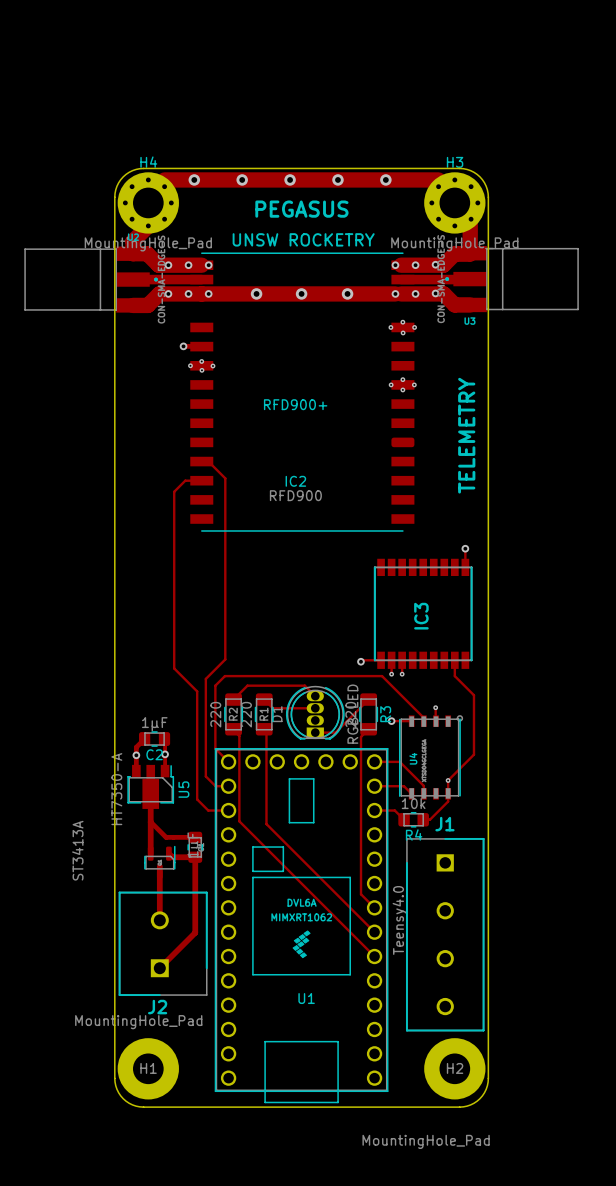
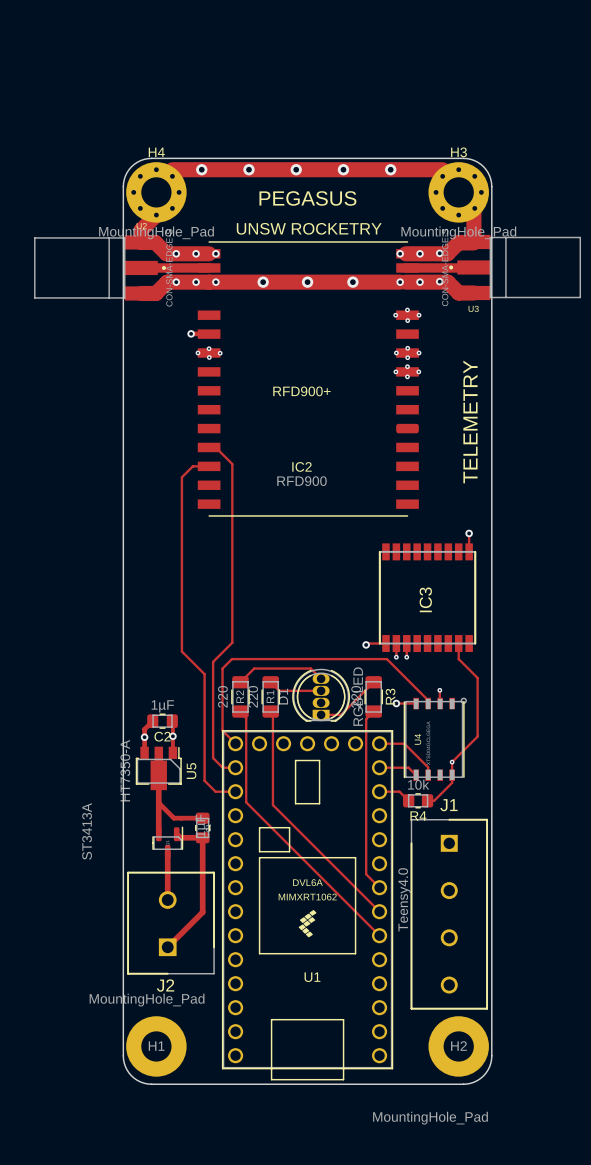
via: none -> (407, 348)
via: none -> (396, 353)
via: none -> (419, 353)
via: none -> (407, 357)

